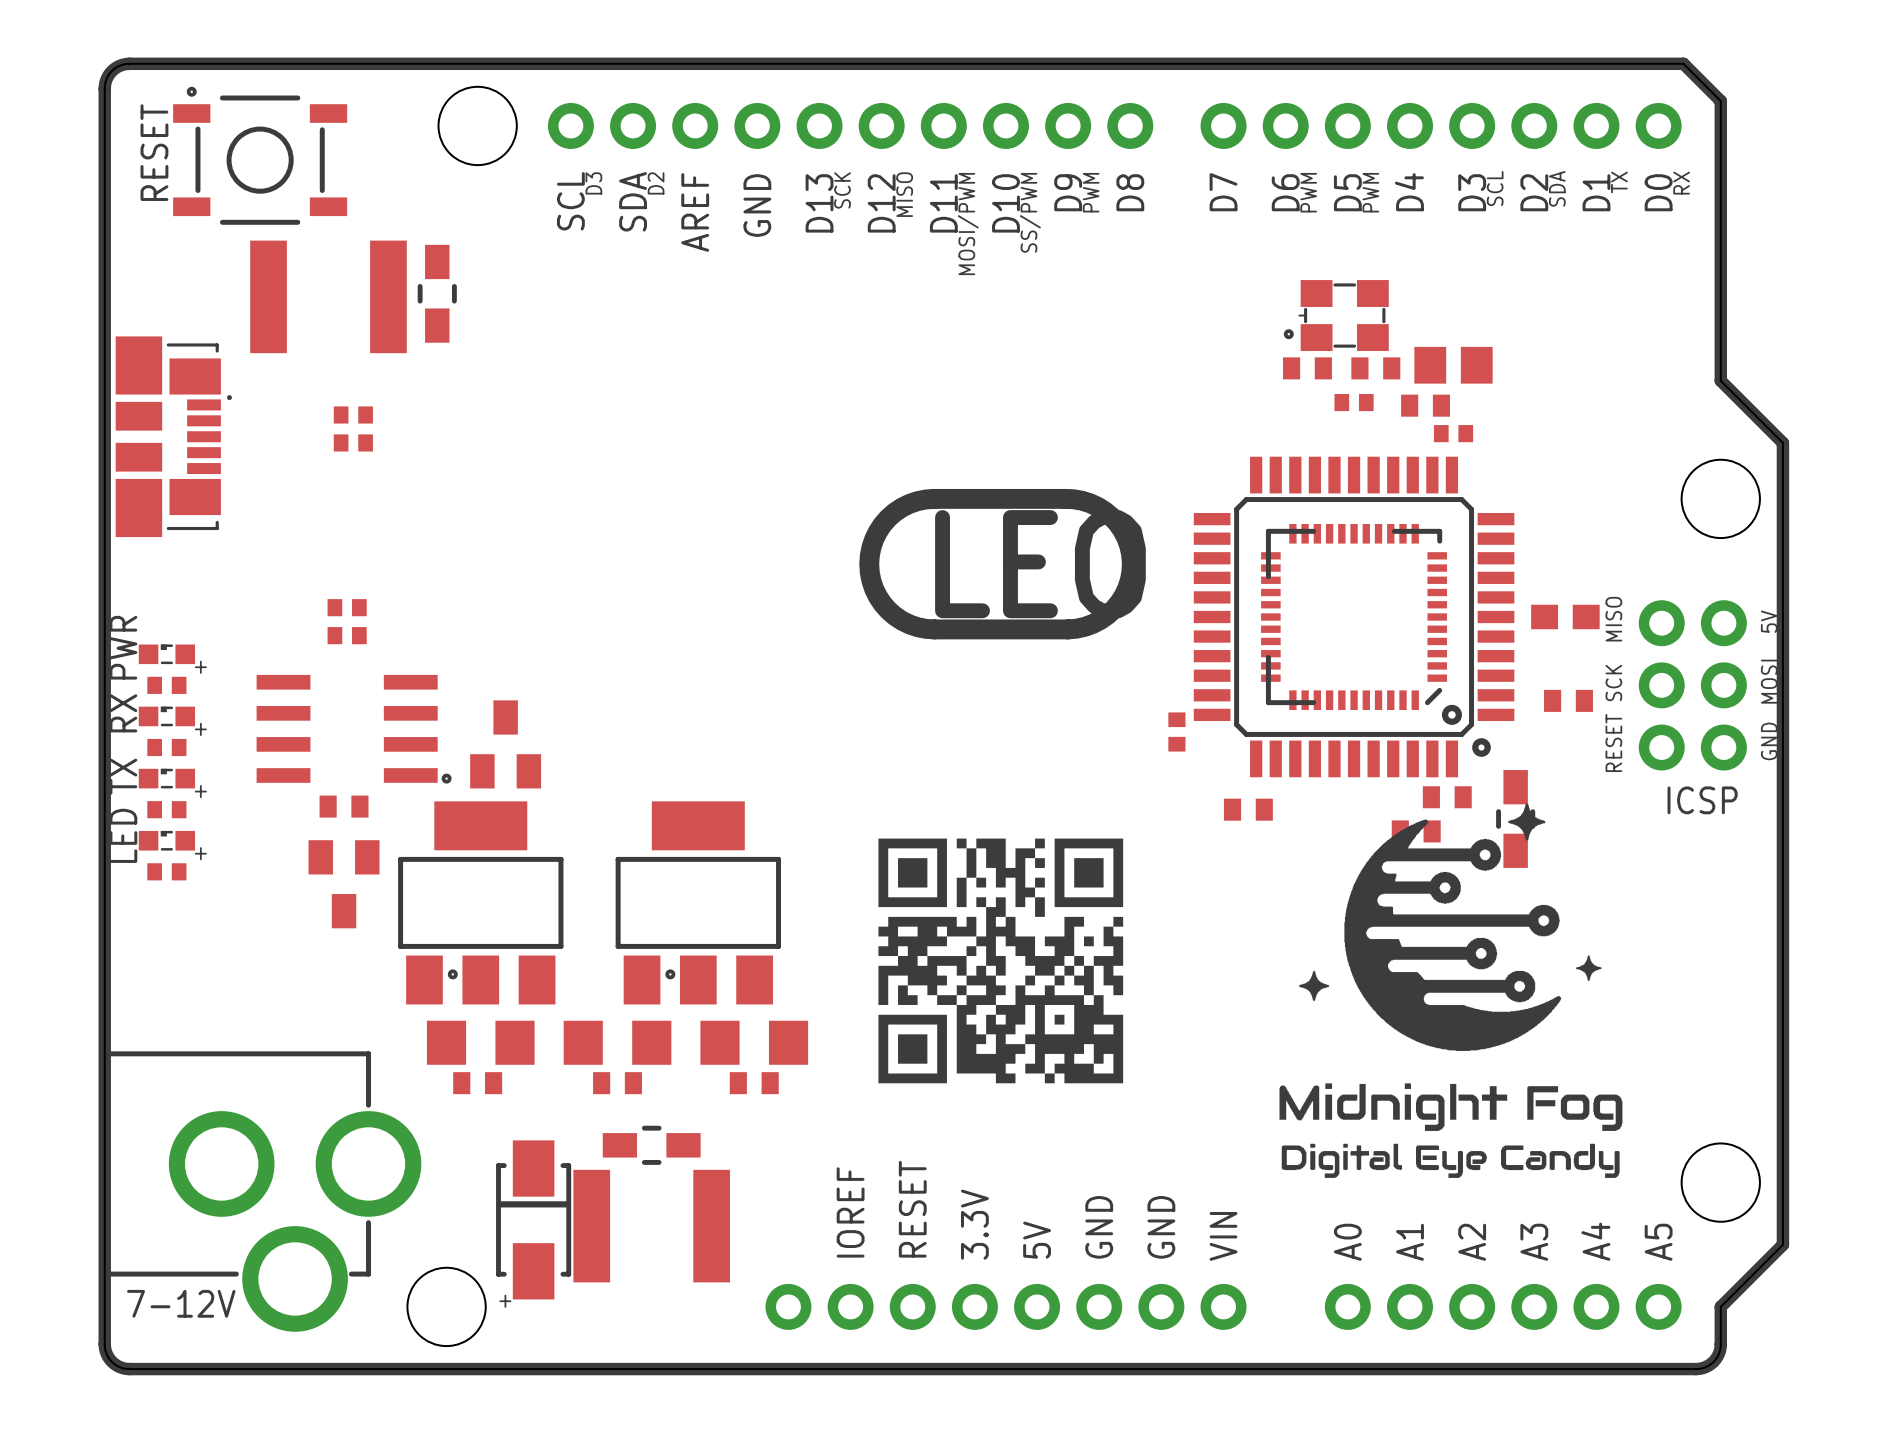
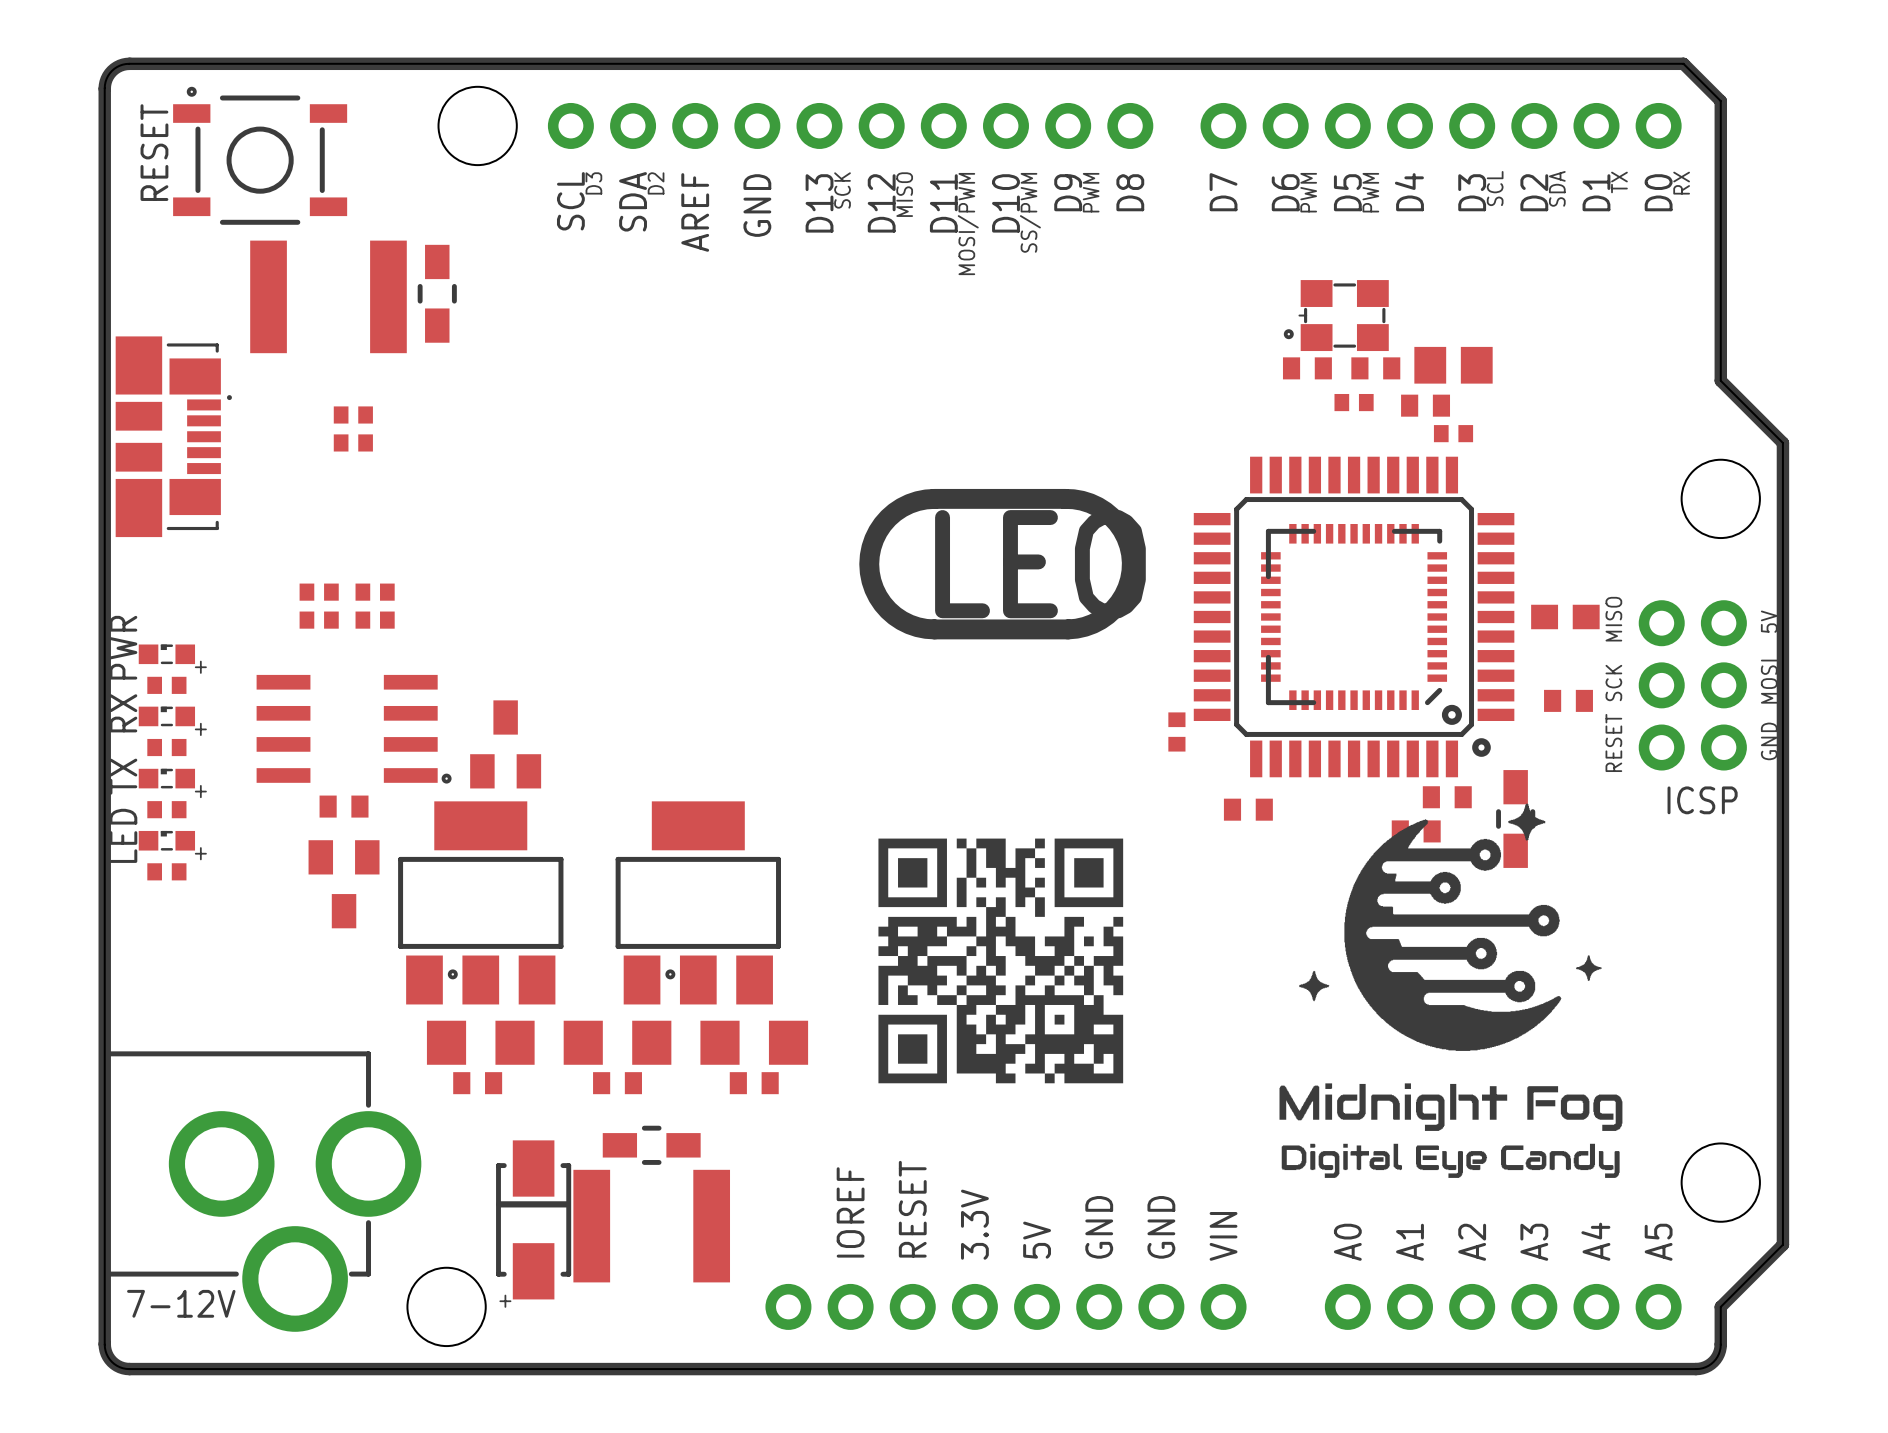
part: none -> (319, 592)
part: none -> (375, 592)
part: (347, 607) -> none
part: none -> (319, 620)
part: none -> (375, 620)
part: (347, 635) -> none

